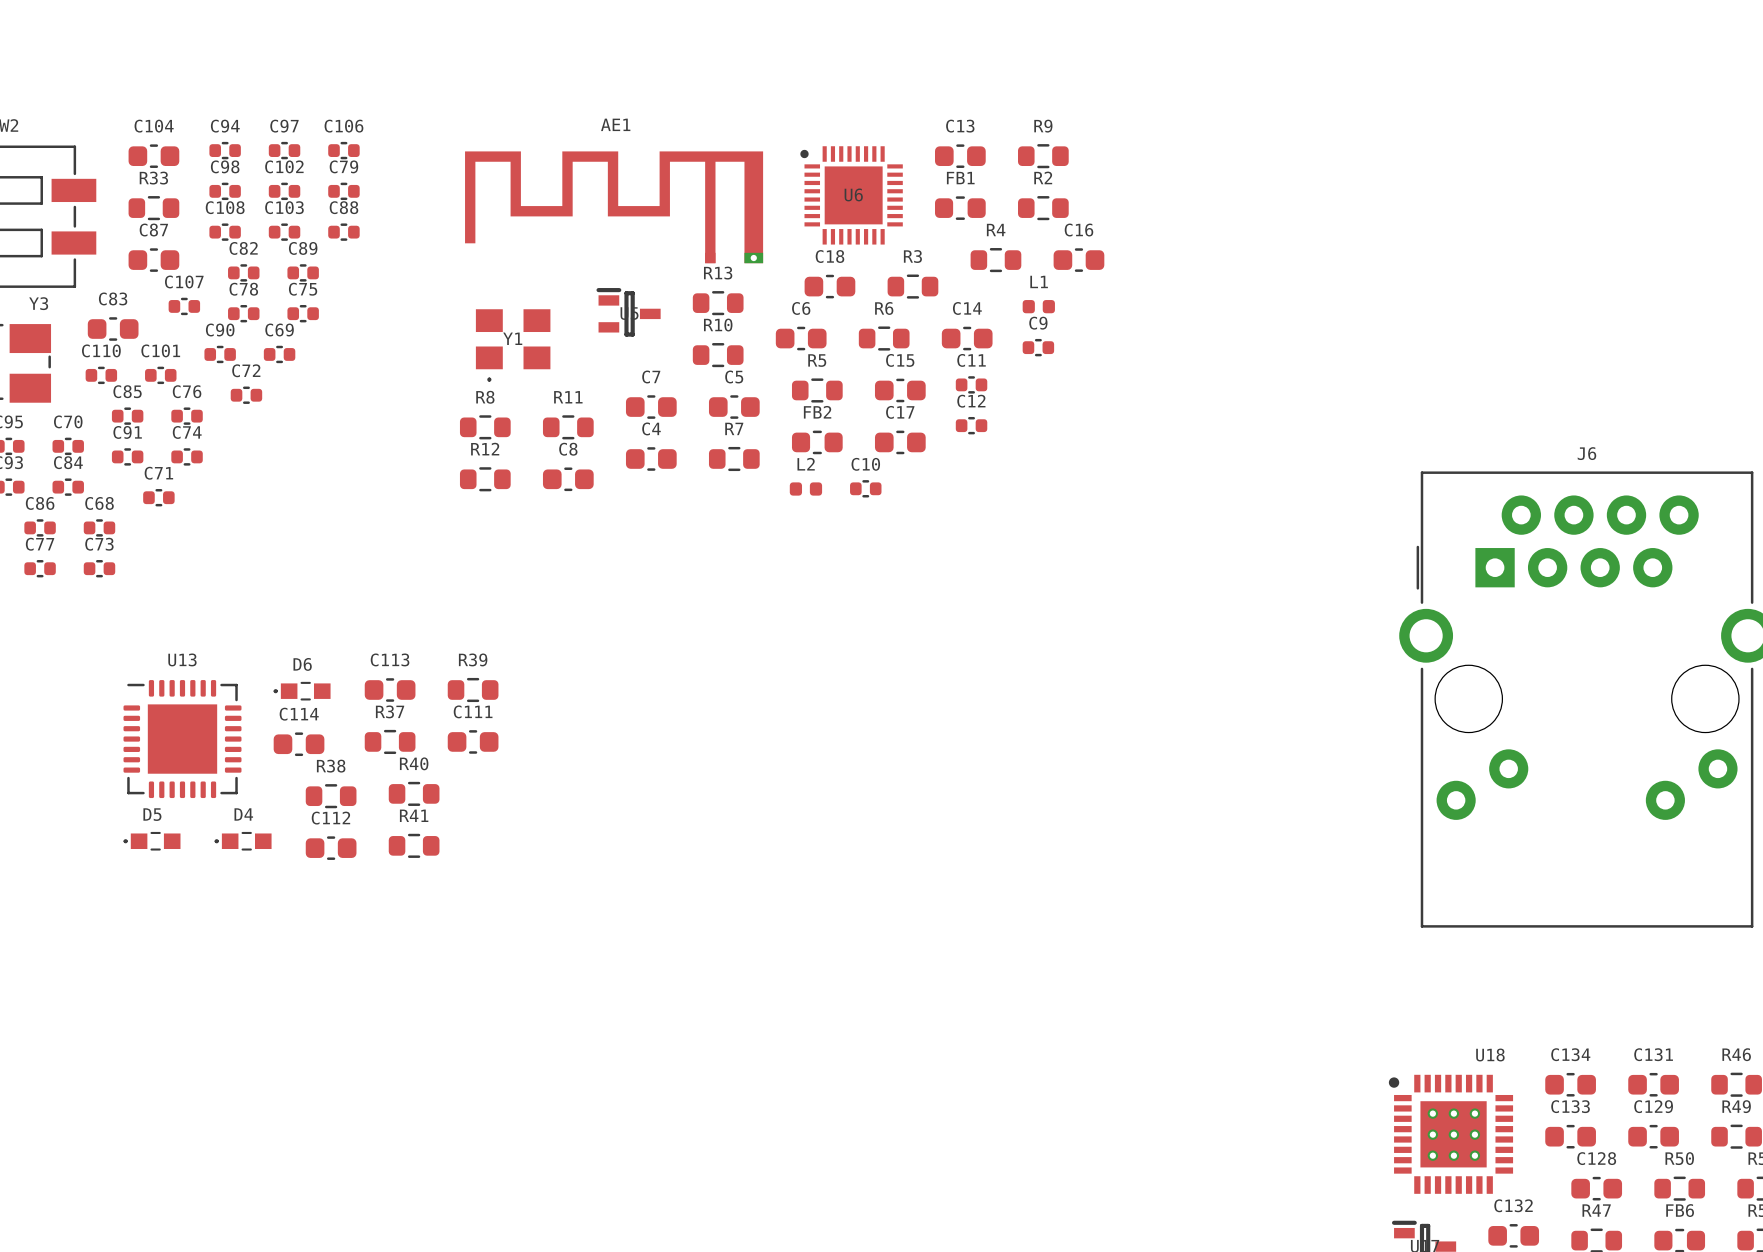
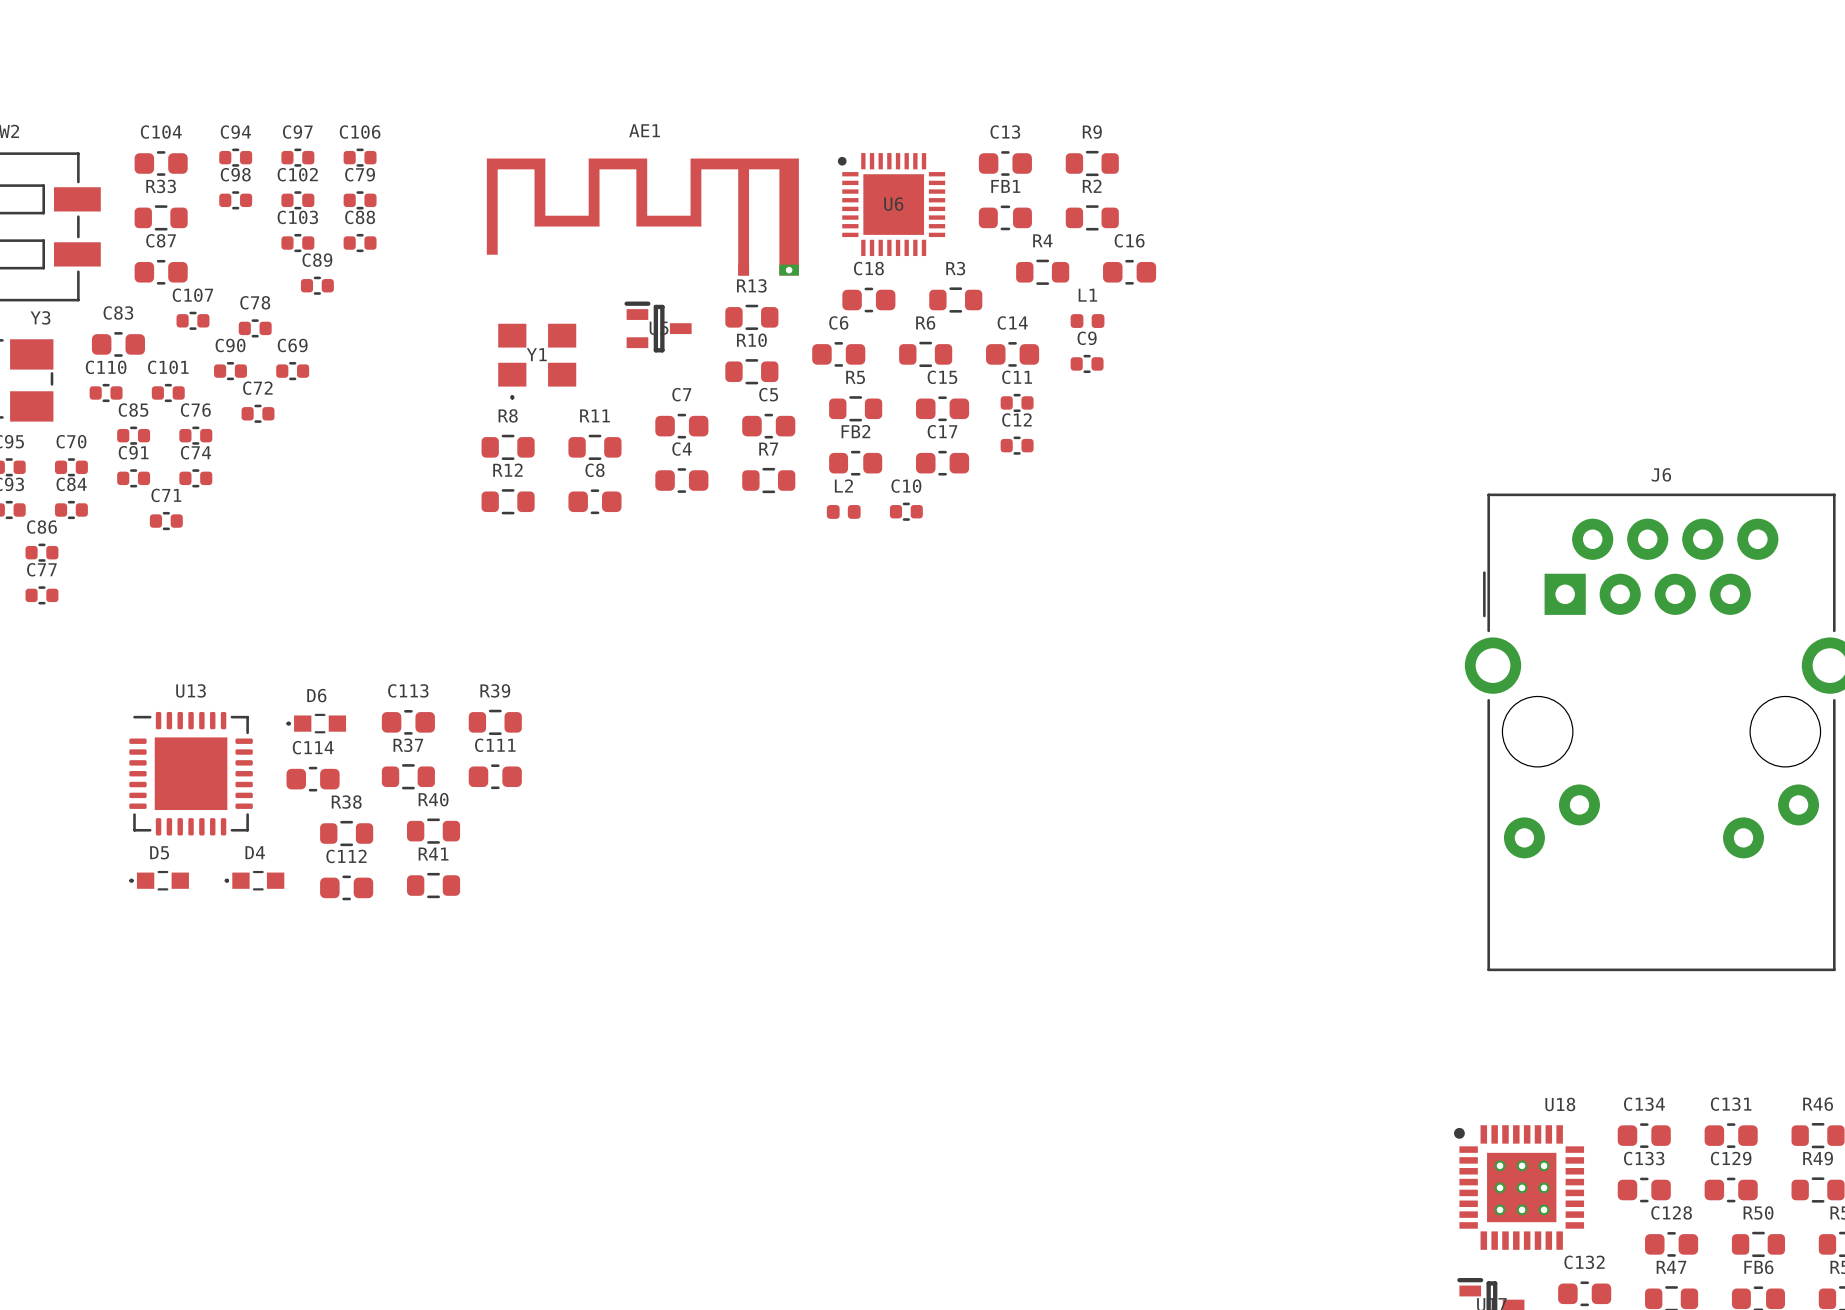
C108: (225, 232) -> none
C82: (243, 272) -> none
C75: (303, 313) -> none
C68: (99, 527) -> none
C73: (99, 568) -> none

